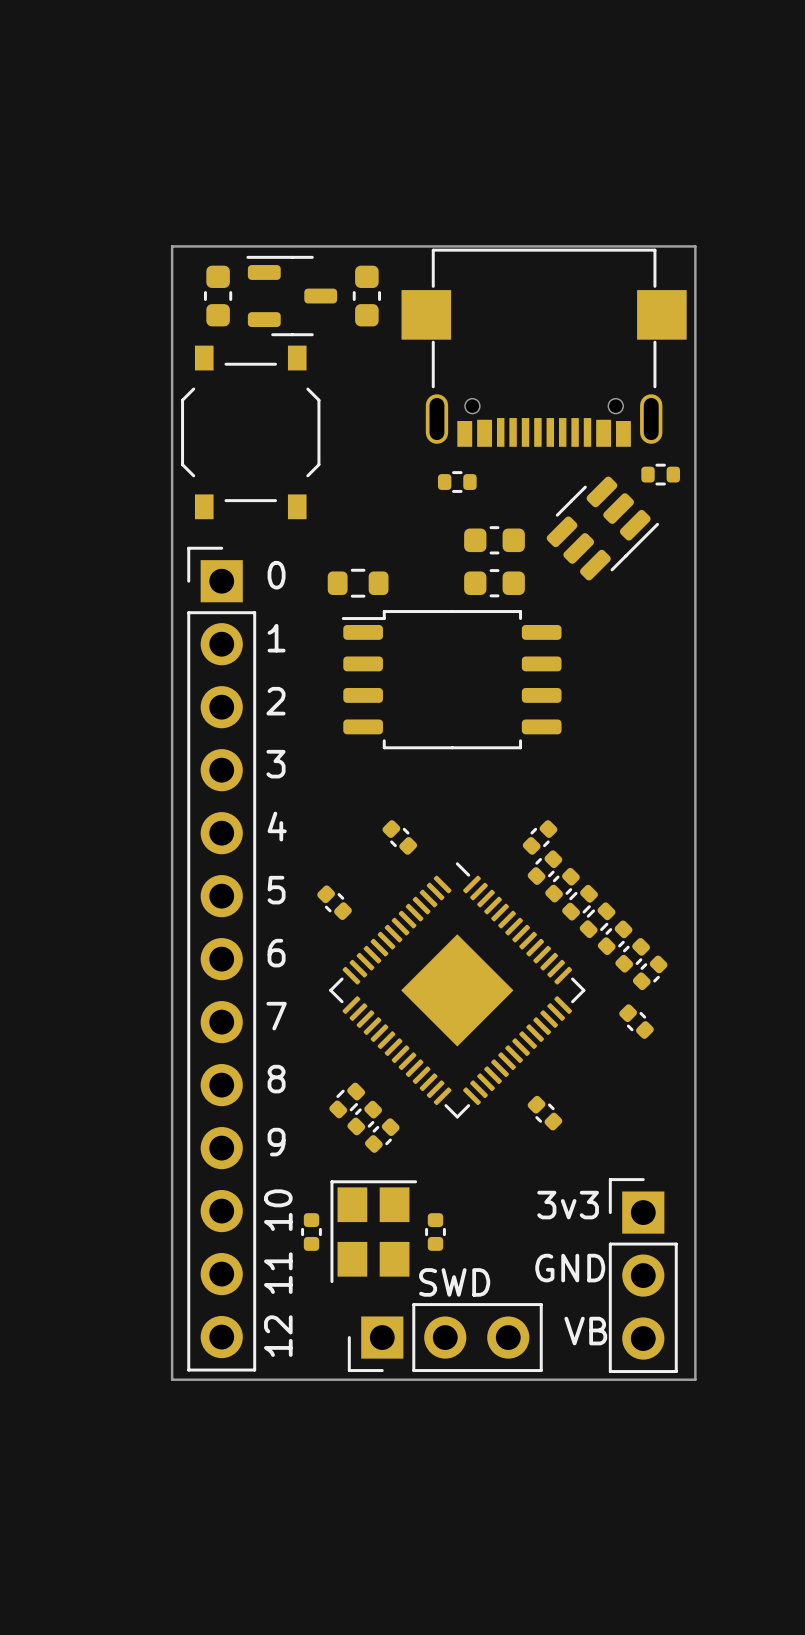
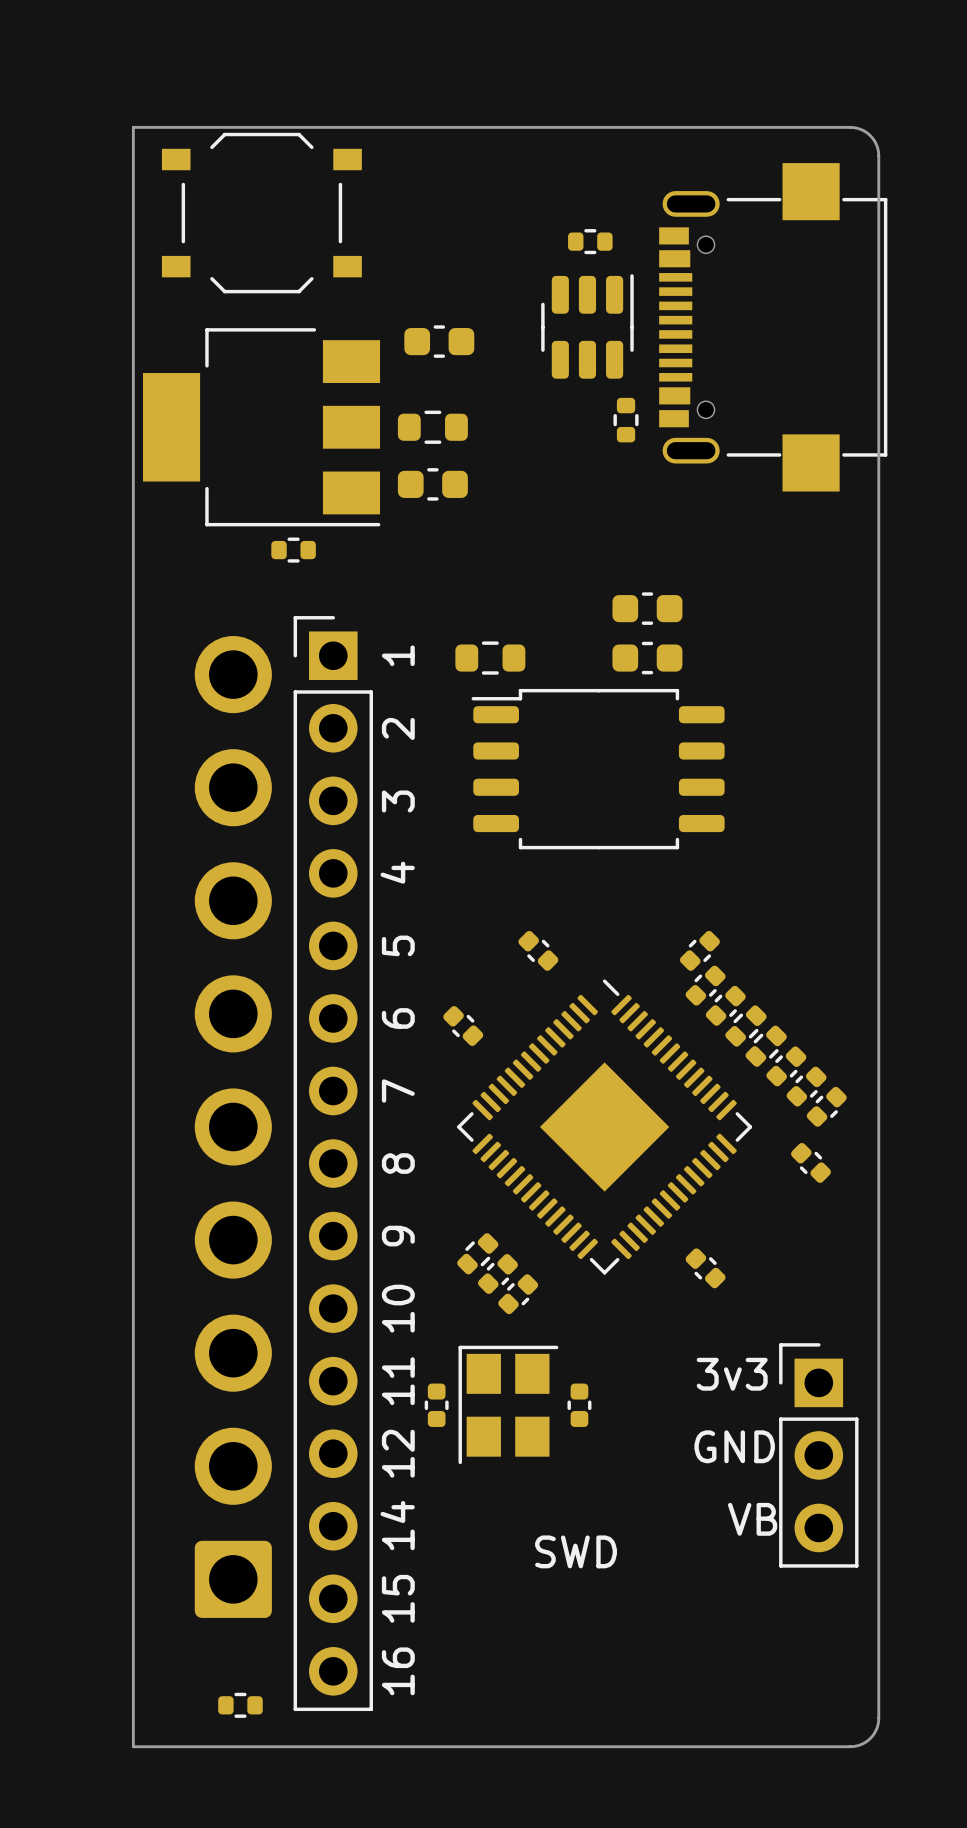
part: none -> (590, 241)
board edge: (695, 246) (172, 246) (172, 1379) (695, 1379) -> (878, 270) (878, 152) (872, 138) (865, 131) (856, 128) (133, 127) (133, 1746) (856, 1746) (870, 1738) (875, 1730) (878, 1721) (878, 1575)
part: none -> (587, 326)
part: (218, 296) -> none
part: (291, 296) -> none
part: (366, 296) -> none
part: none -> (439, 341)
part rotation: 0° (544, 347) -> 90° clockwise (773, 327)
part: none -> (626, 420)
part: none -> (261, 427)
part: none -> (432, 427)
part rotation: 0° (250, 432) -> 90° clockwise (261, 213)
part position: (250, 432) -> (261, 213)
part: none -> (432, 484)
part: (660, 474) -> none
part: (457, 482) -> none
part: none -> (293, 550)
part: (602, 528) -> none
text: 0 (276, 575) -> none
text rotation: 0° (276, 638) -> 90° counterclockwise (398, 655)
text position: 1 (276, 638) -> 1 (398, 655)
text rotation: 0° (275, 701) -> 90° counterclockwise (398, 728)
text position: 2 (275, 701) -> 2 (398, 728)
text rotation: 0° (275, 764) -> 90° counterclockwise (398, 801)
text position: 3 (275, 764) -> 3 (398, 801)
text rotation: 0° (277, 826) -> 90° counterclockwise (397, 872)
text position: 4 (277, 826) -> 4 (397, 872)
text rotation: 0° (276, 890) -> 90° counterclockwise (398, 945)
text position: 5 (276, 890) -> 5 (398, 945)
text rotation: 0° (276, 953) -> 90° counterclockwise (398, 1018)
text position: 6 (276, 953) -> 6 (398, 1018)
part: (221, 959) -> none
part: none -> (233, 1126)
text rotation: 0° (276, 1016) -> 90° counterclockwise (398, 1091)
text position: 7 (276, 1016) -> 7 (398, 1091)
part: none -> (333, 1163)
text rotation: 0° (276, 1079) -> 90° counterclockwise (398, 1163)
text position: 8 (276, 1079) -> 8 (398, 1163)
text rotation: 0° (276, 1142) -> 90° counterclockwise (398, 1236)
text position: 9 (276, 1142) -> 9 (398, 1236)
text position: 10 (278, 1210) -> 10 (398, 1308)
text position: 11 (278, 1273) -> 11 (398, 1381)
text position: SWD (454, 1282) -> SWD (576, 1551)
text: none -> 14 (397, 1525)
text position: 12 (278, 1336) -> 12 (398, 1453)
part: (445, 1337) -> none
text: none -> 15 (398, 1598)
text: none -> 16 (398, 1671)
part: none -> (240, 1705)

